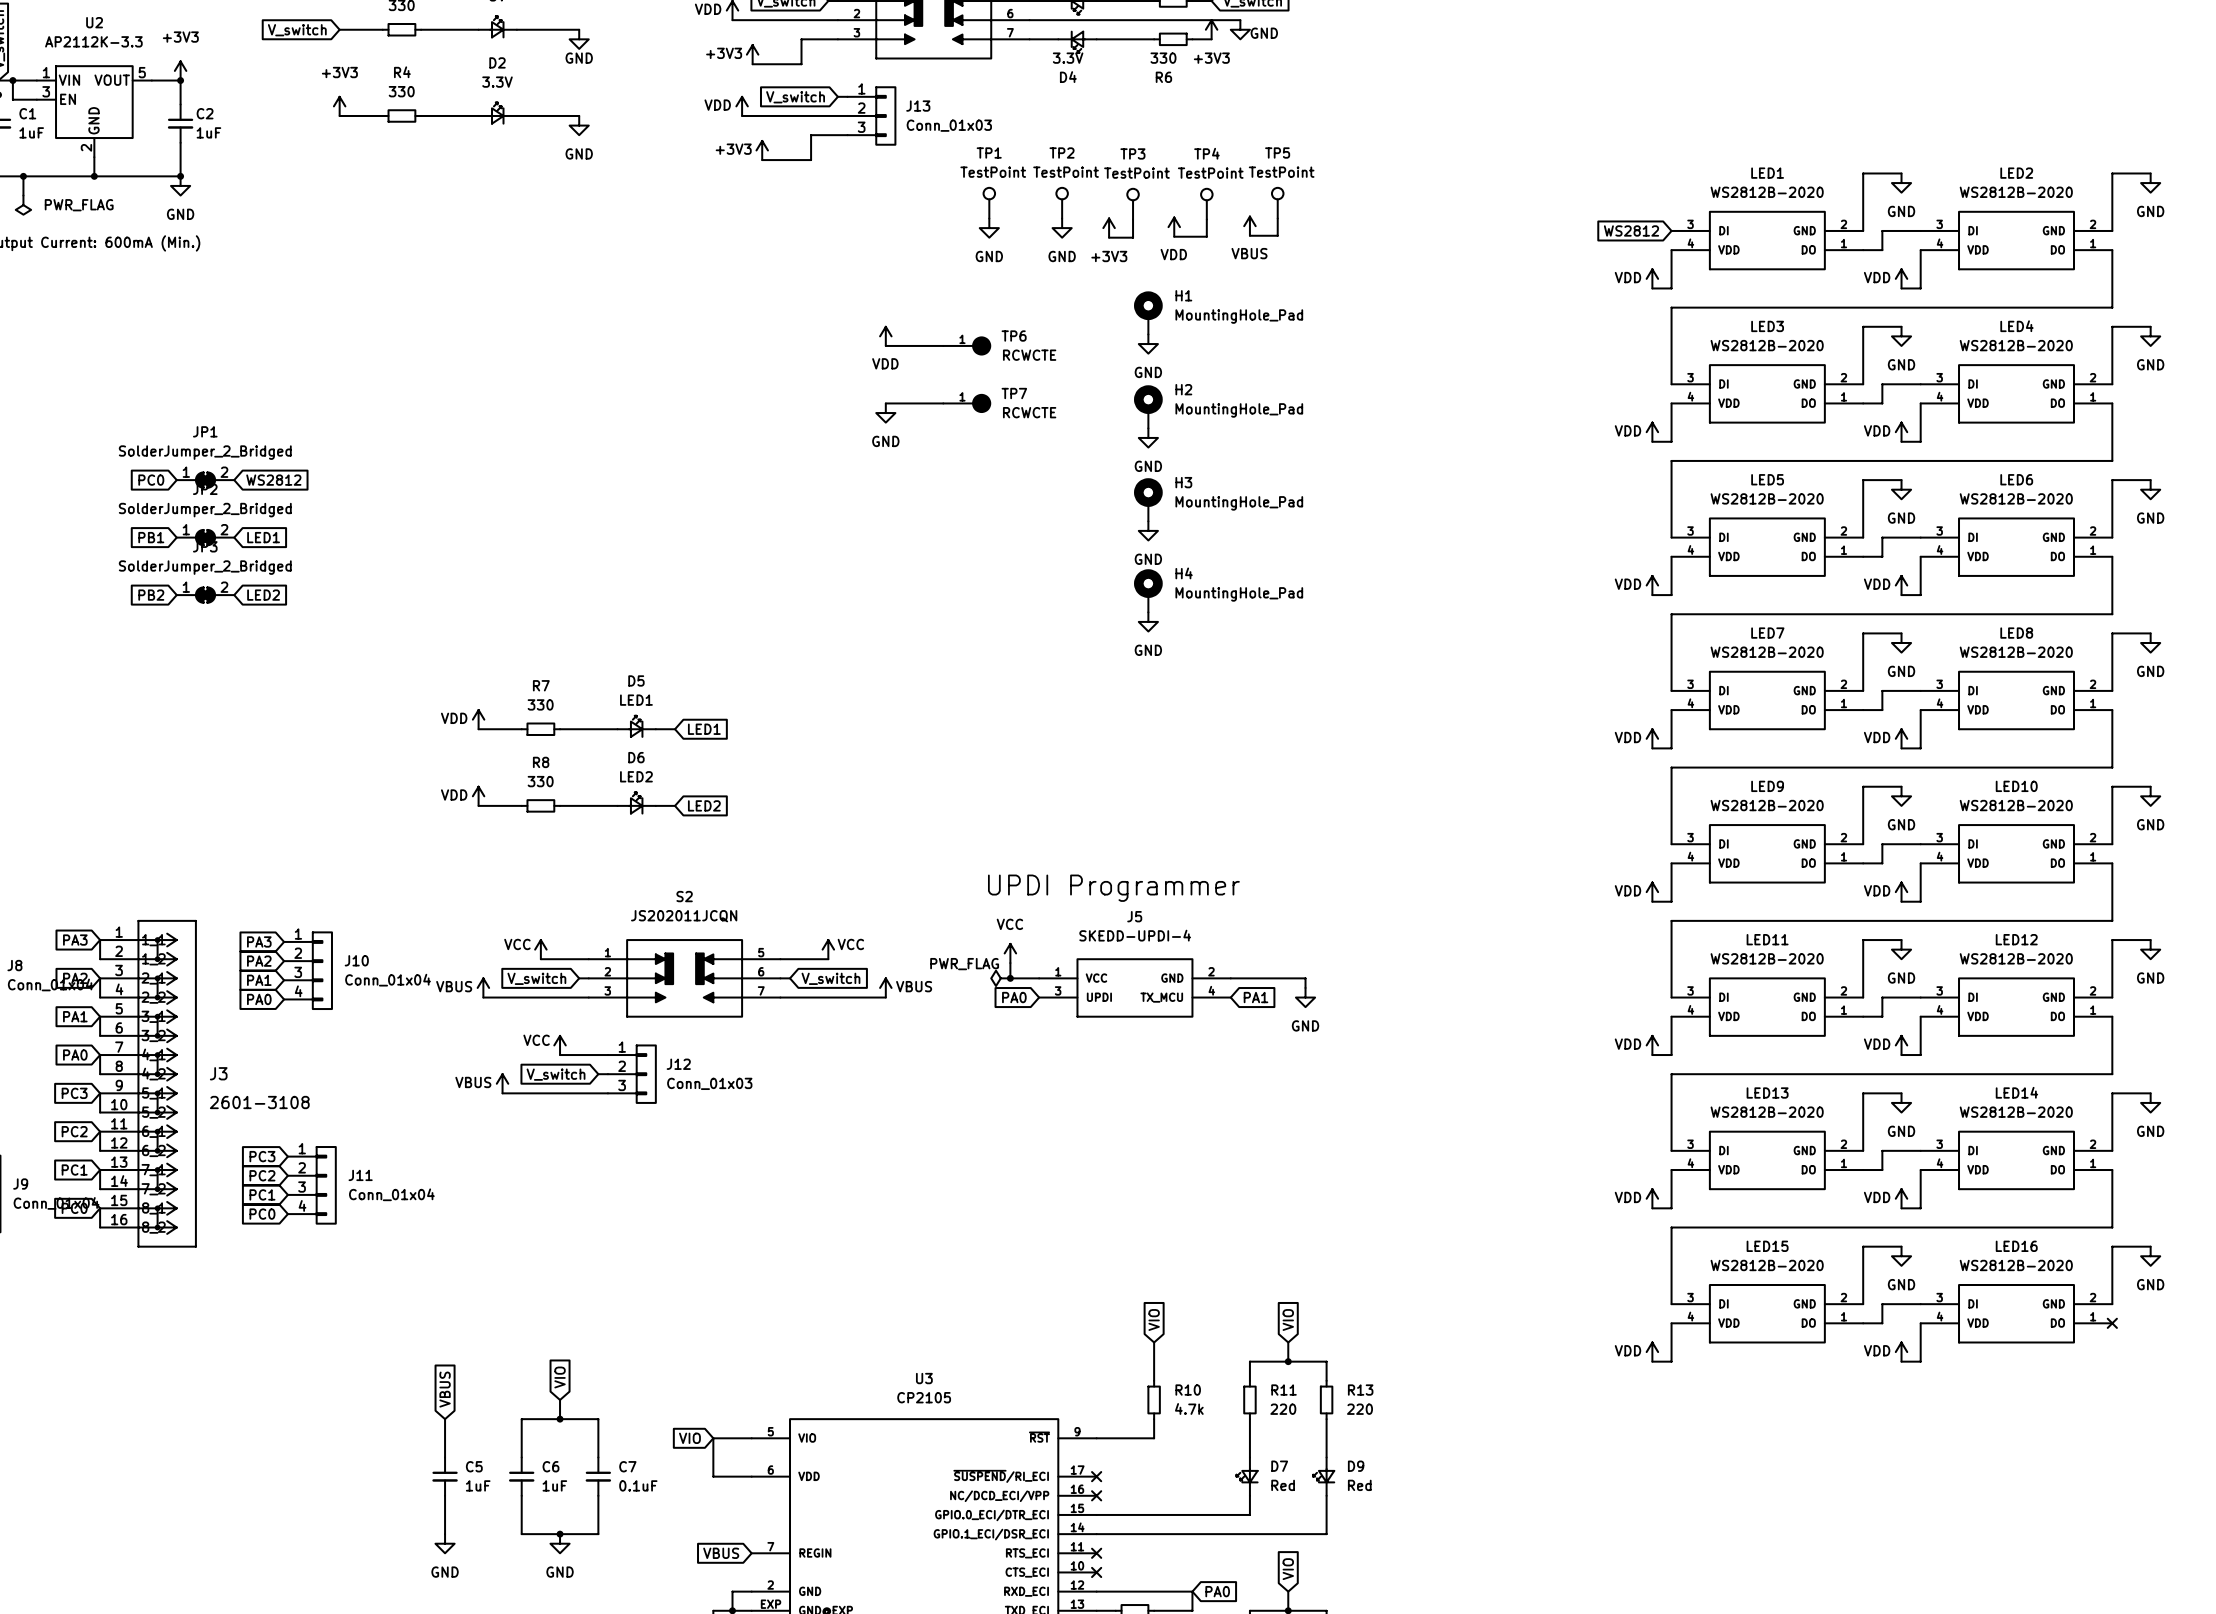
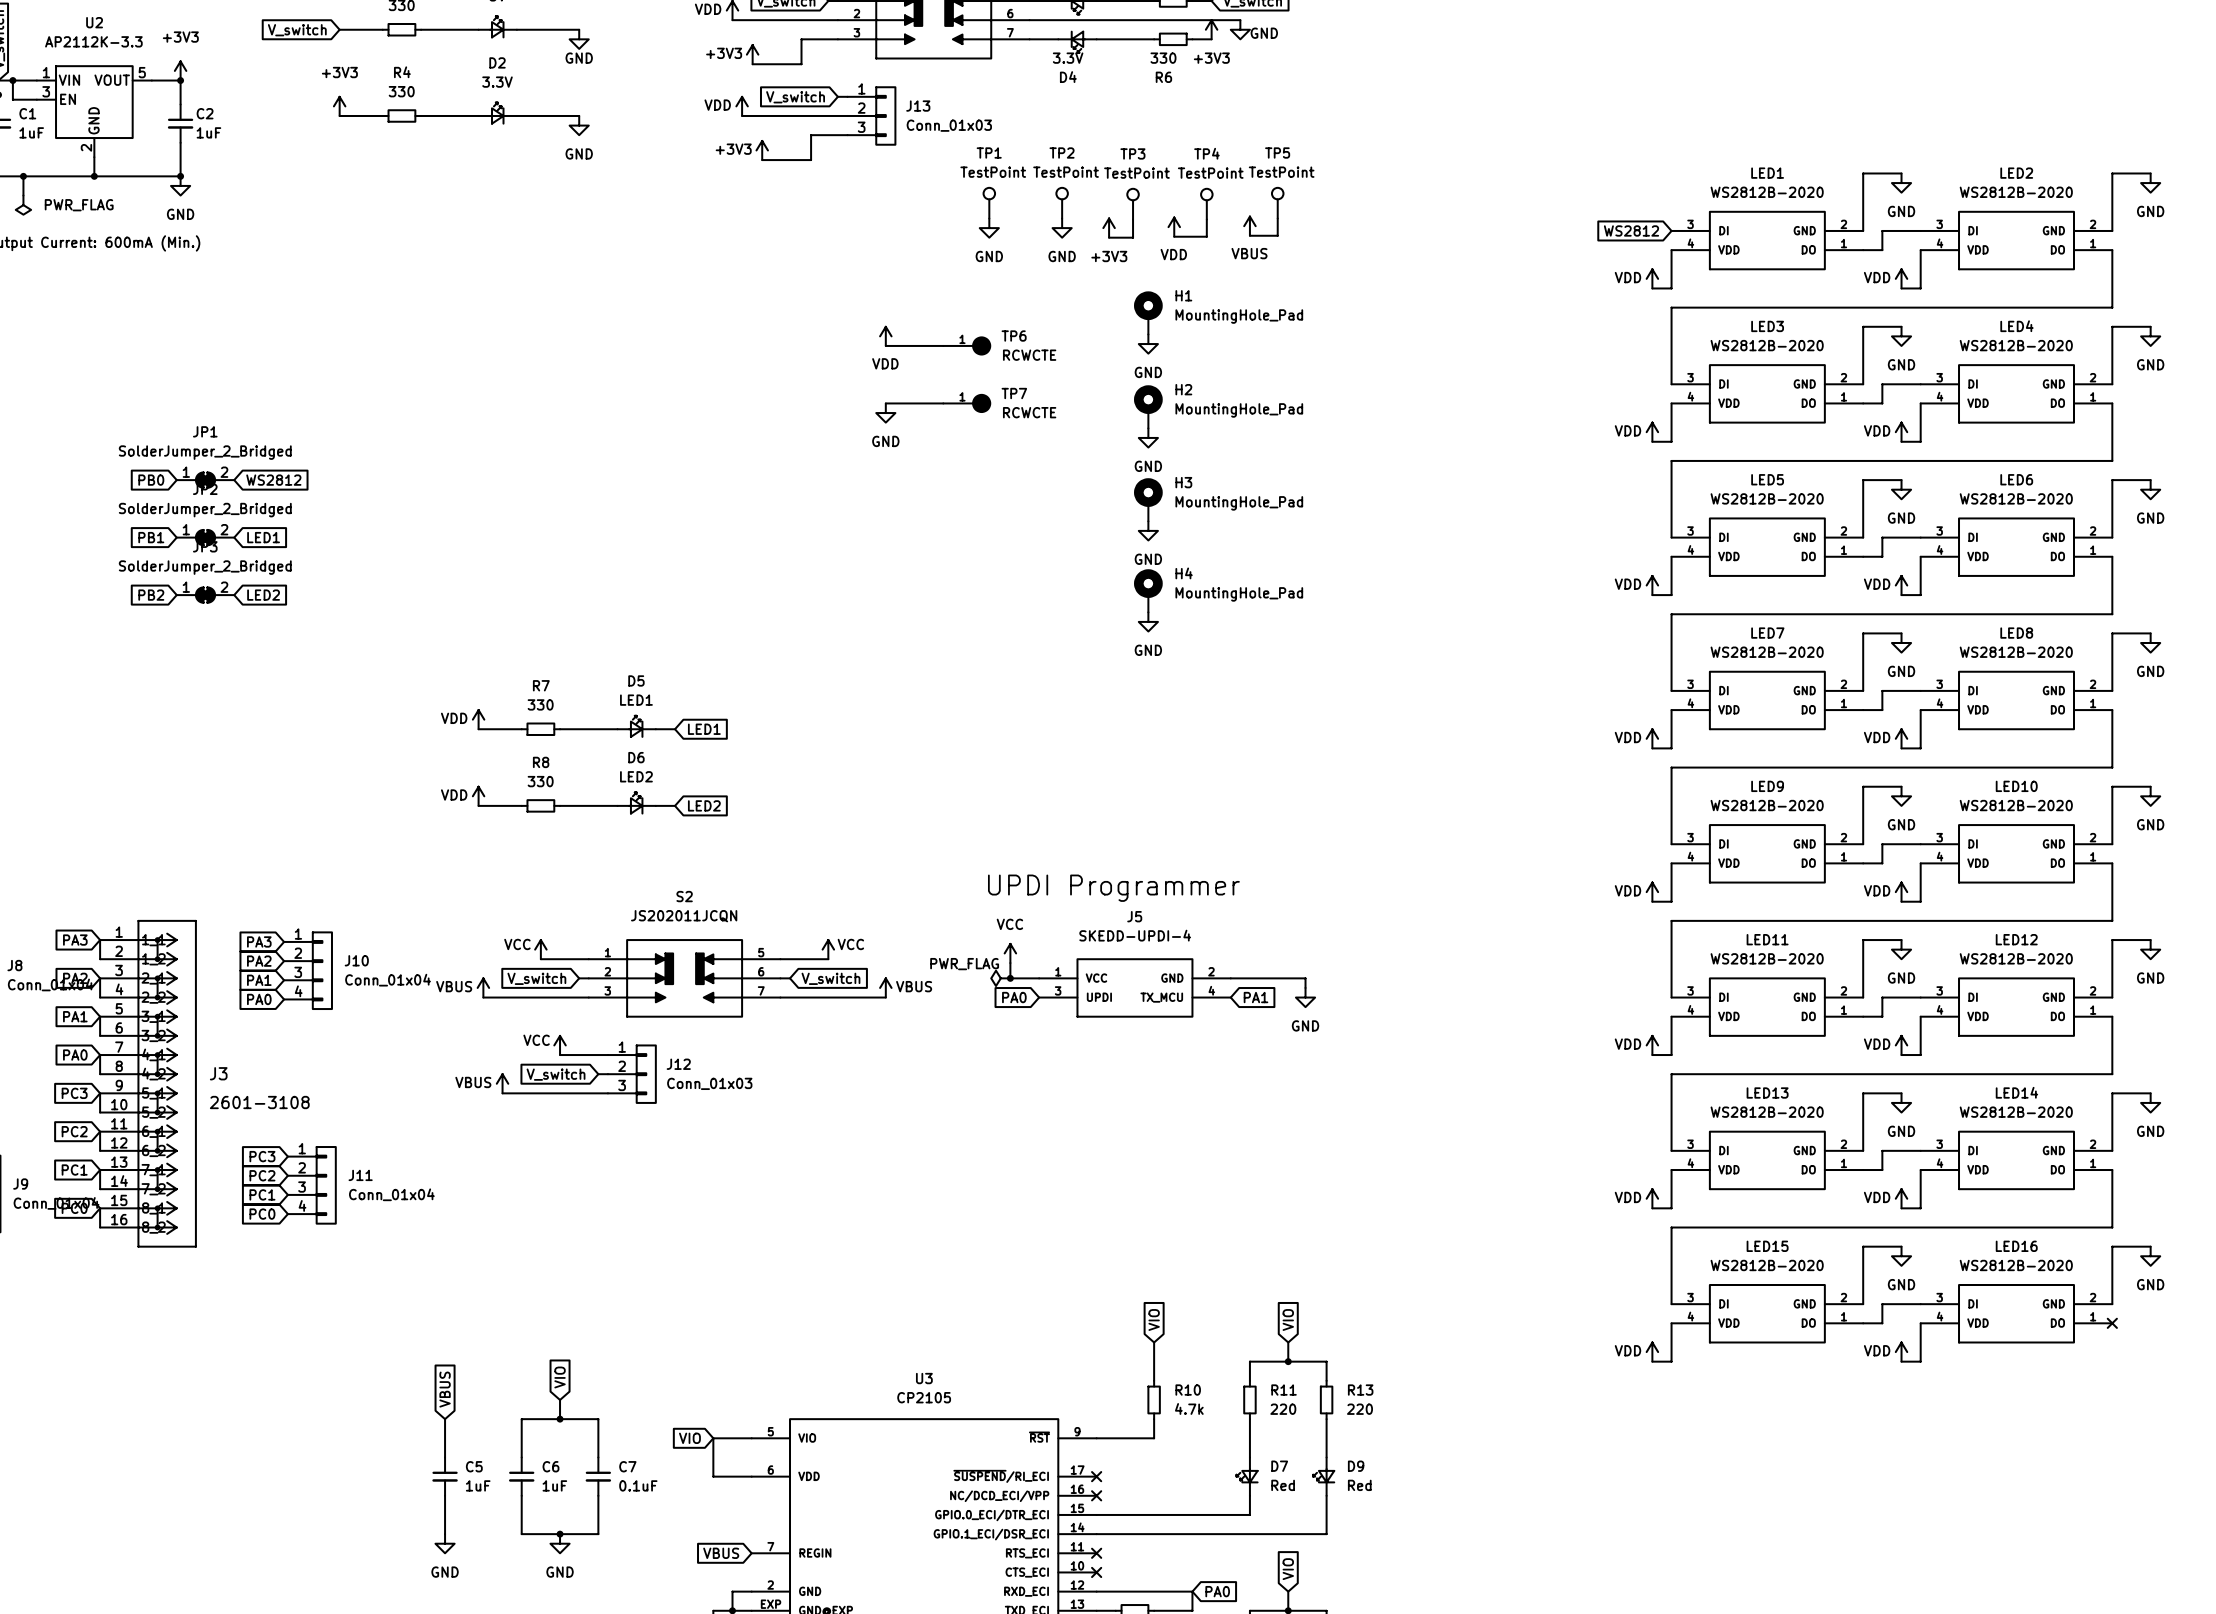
global label: PC0 (151, 480) -> PB0 (151, 480)

